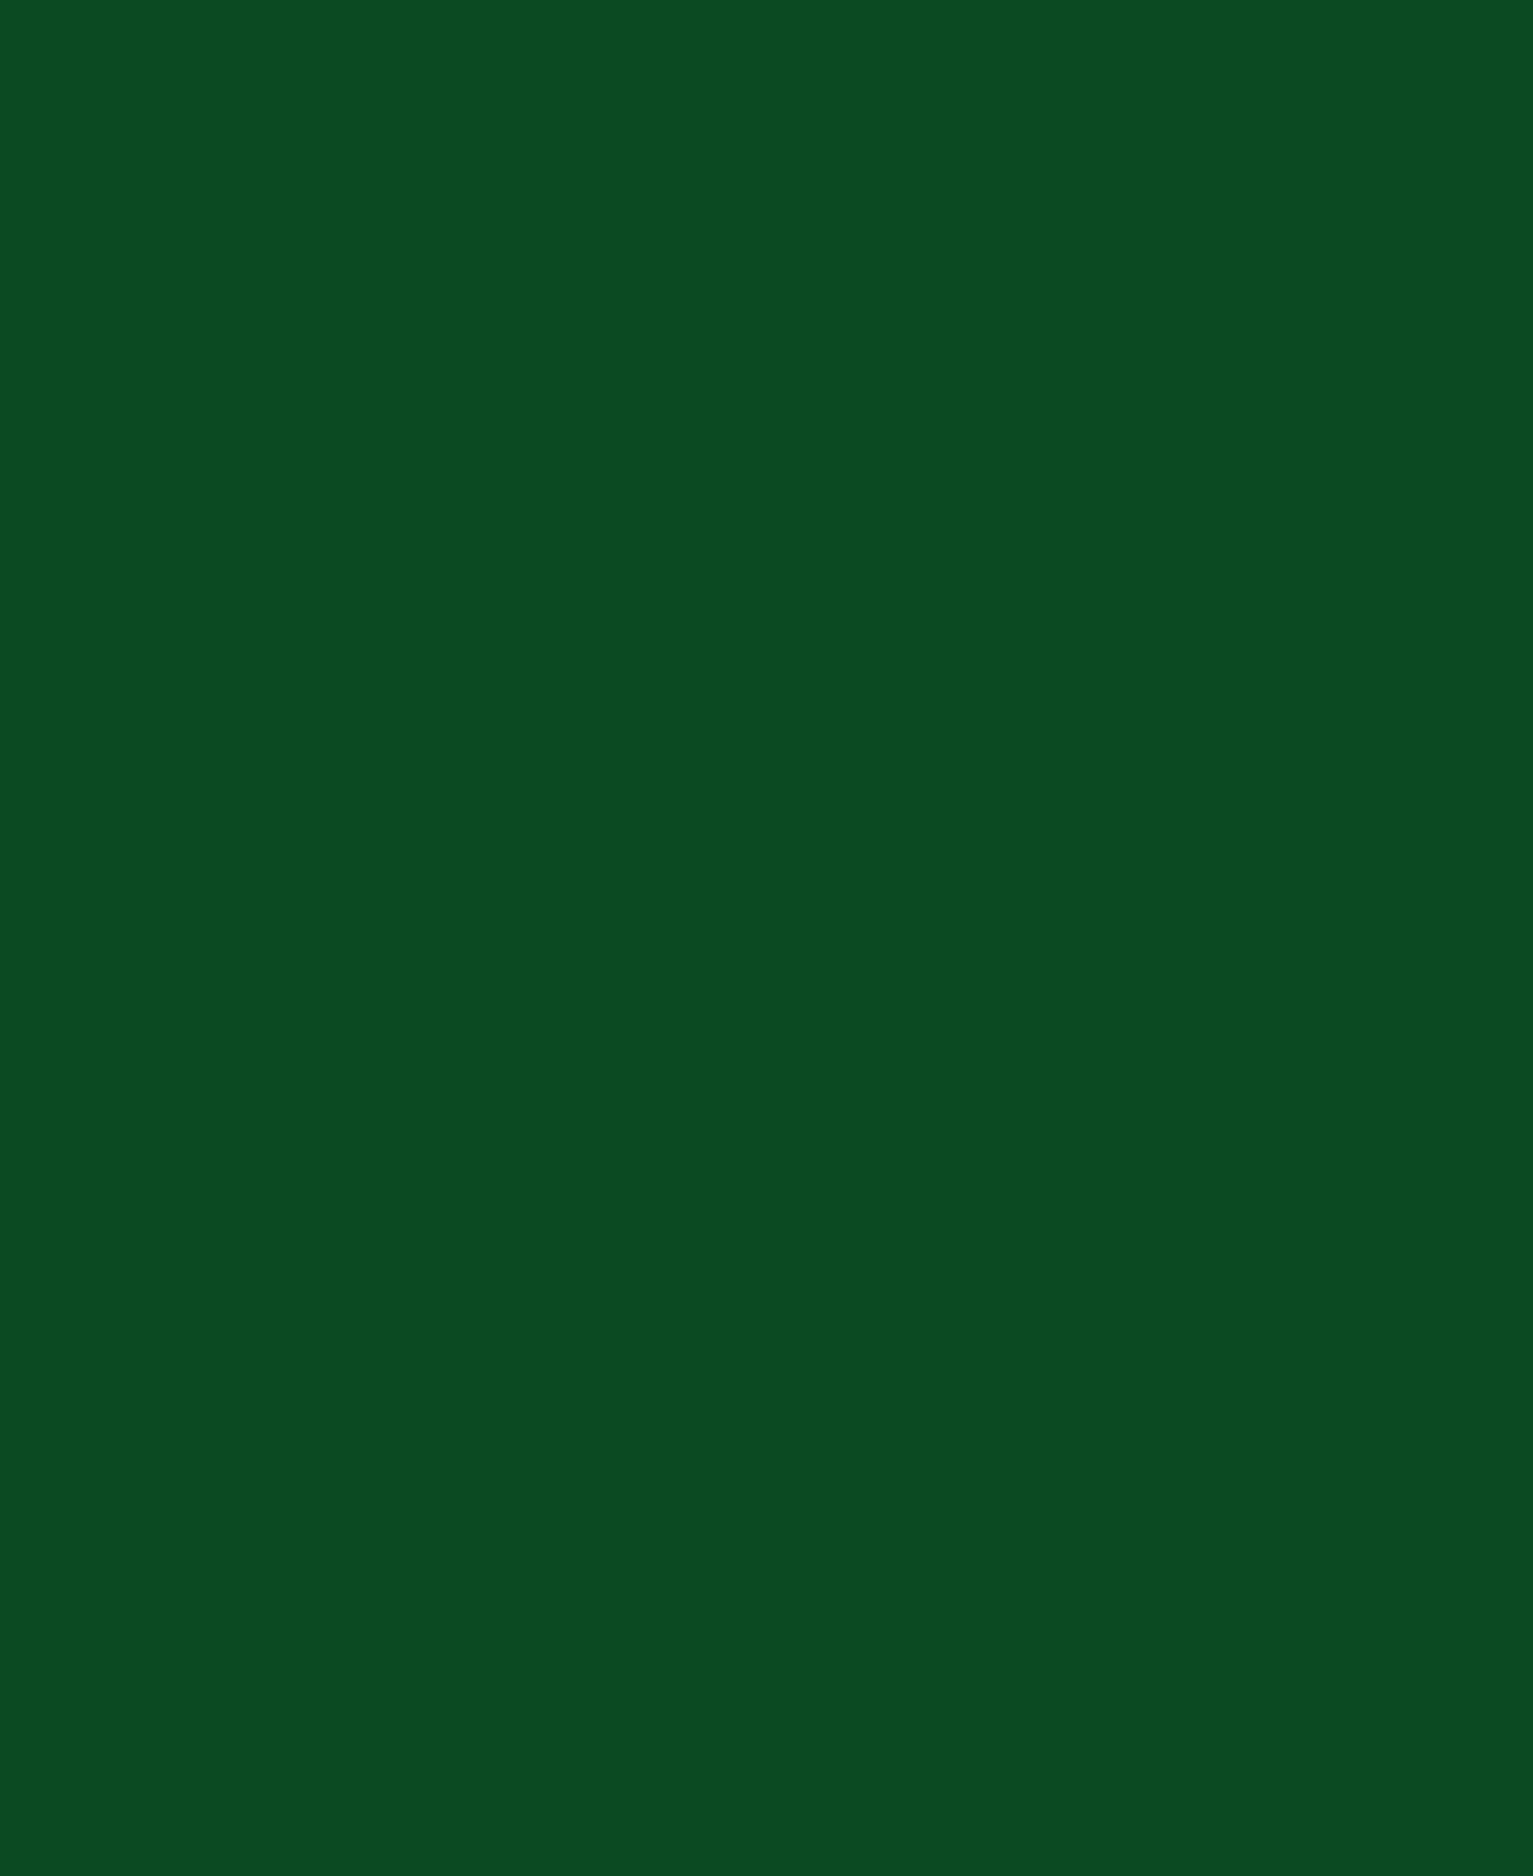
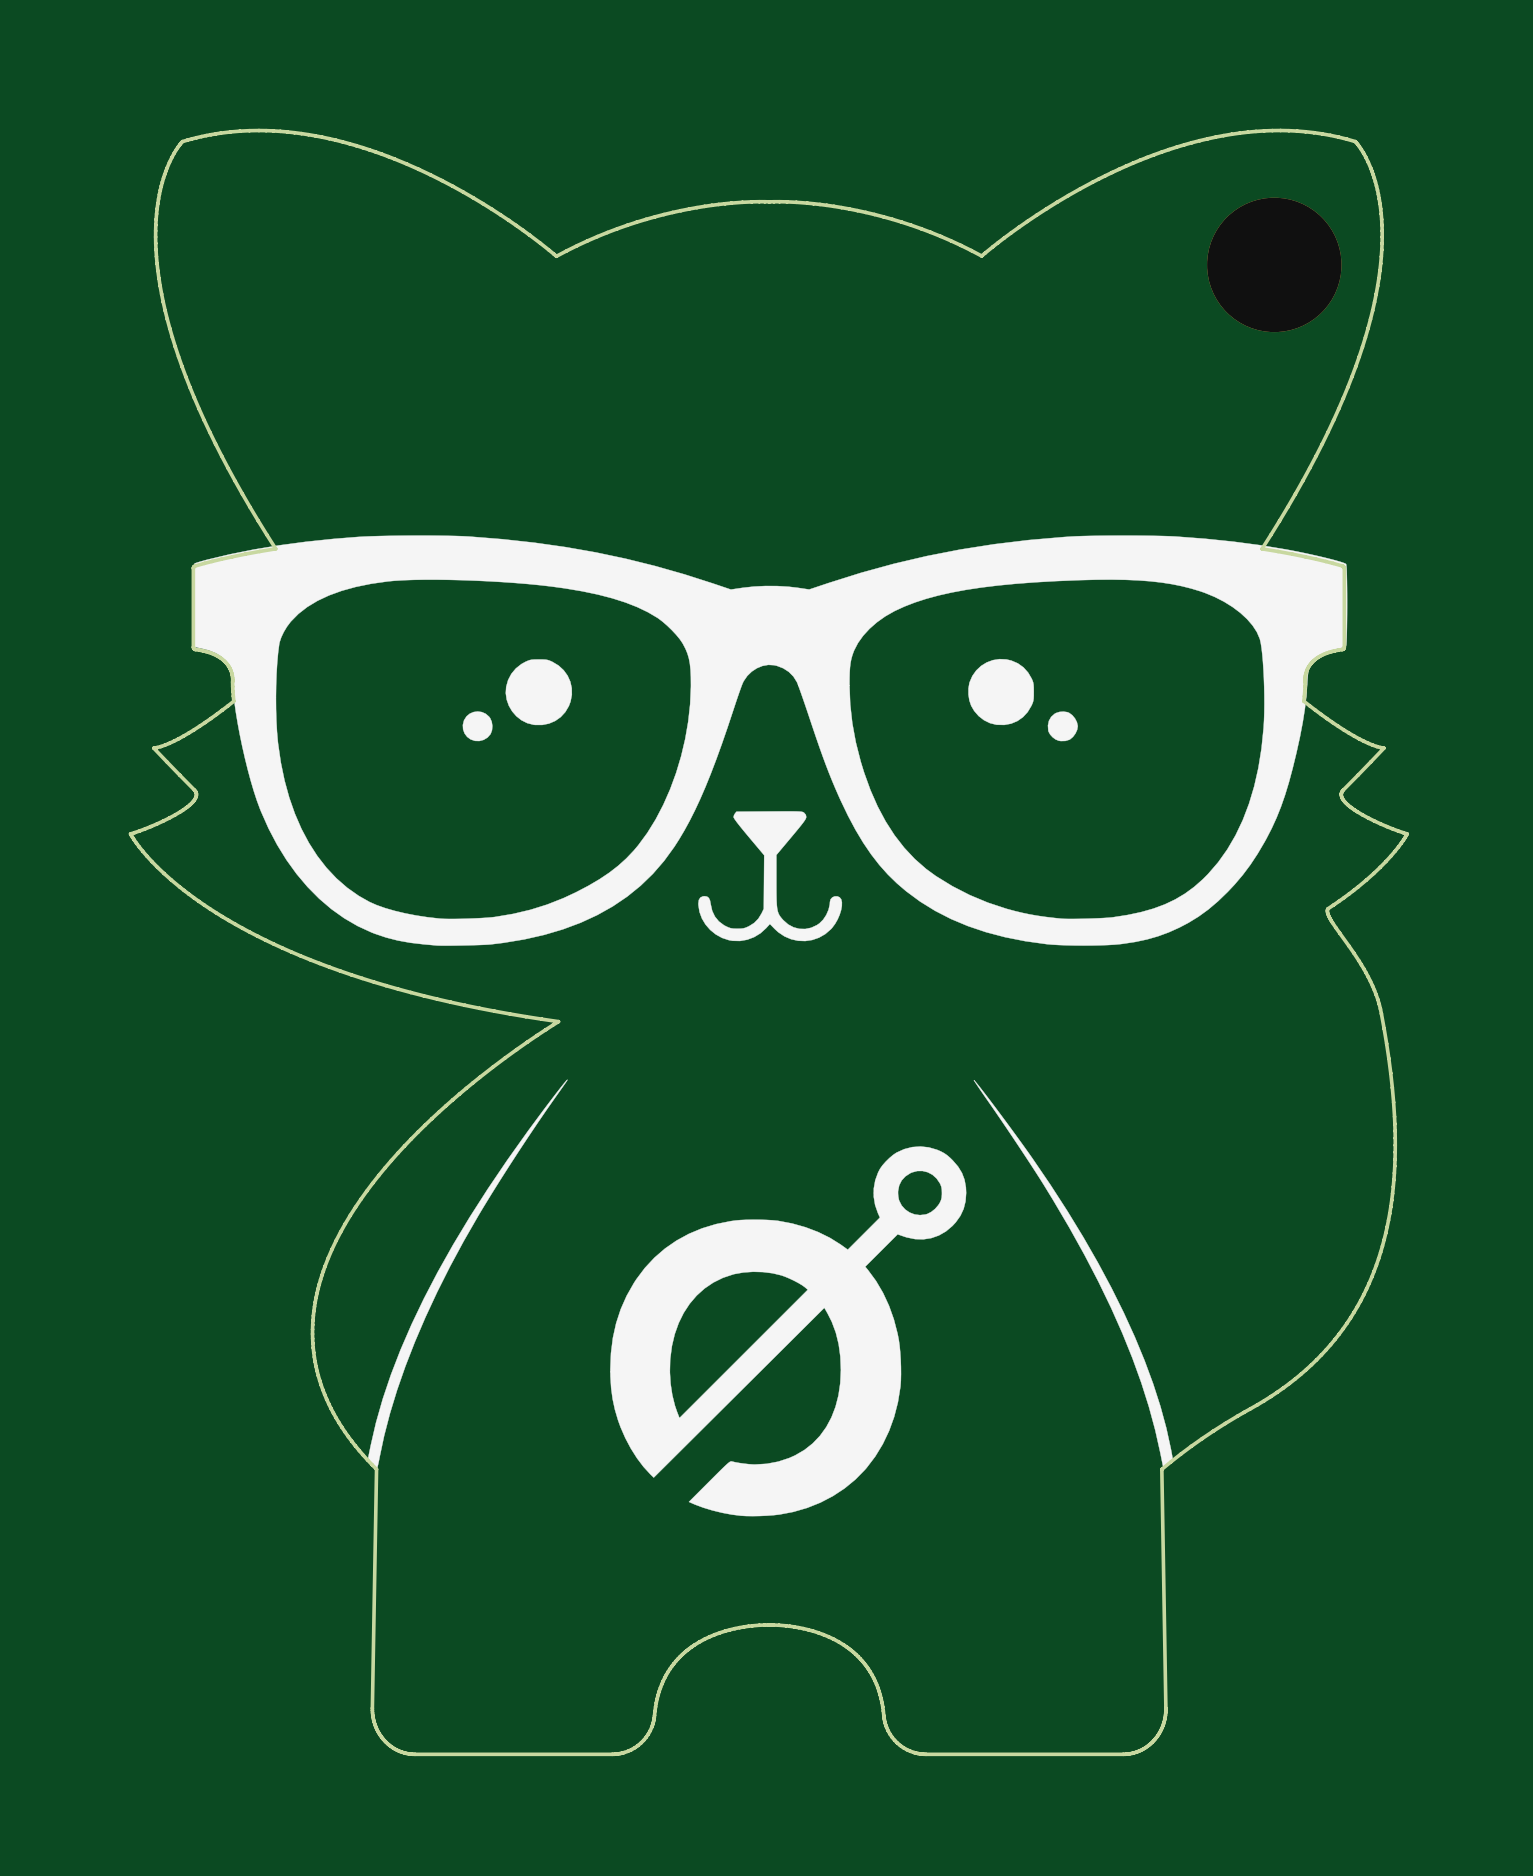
part: none -> (1274, 264)
drawing: none -> [193, 535, 1348, 1517]
board edge: none -> (196, 793) (153, 748) (169, 743) (188, 733) (233, 701) (232, 675) (227, 664) (216, 655) (193, 648) (193, 567) (221, 559) (275, 548) (235, 481) (204, 420) (182, 366) (165, 310) (156, 256) (156, 213) (165, 171) (174, 153) (182, 141) (220, 133) (266, 130) (315, 135) (362, 147) (406, 164) (463, 192) (516, 225) (556, 256) (607, 232) (655, 216) (704, 206) (759, 201) (813, 203) (874, 214) (930, 232) (981, 256) (1018, 227) (1057, 202) (1092, 182) (1132, 163) (1169, 149) (1207, 138) (1247, 132) (1280, 130) (1322, 133) (1355, 141) (1363, 153) (1371, 171) (1381, 213) (1381, 249) (1377, 286) (1368, 328) (1355, 366) (1338, 409) (1316, 455) (1262, 548) (1316, 559) (1344, 567) (1344, 648) (1321, 655) (1309, 664) (1305, 675) (1303, 701) (1348, 733) (1368, 743) (1383, 748) (1341, 793)
board edge: none -> (196, 794) (193, 801) (180, 811) (157, 823) (130, 833) (142, 851) (164, 873) (215, 912) (282, 947) (362, 978) (450, 1002) (558, 1021) (516, 1049) (466, 1088) (424, 1125) (391, 1160) (361, 1199) (340, 1232) (324, 1266) (316, 1297) (312, 1320) (312, 1343) (321, 1385) (341, 1427) (376, 1469) (373, 1719) (379, 1733) (389, 1745) (402, 1752) (414, 1754) (612, 1754) (627, 1751) (638, 1745) (648, 1734) (653, 1723) (661, 1684) (669, 1669) (682, 1654) (699, 1642) (720, 1632) (739, 1627) (764, 1625) (789, 1626) (813, 1631) (833, 1639) (853, 1652) (866, 1666) (875, 1681) (881, 1698) (885, 1723) (890, 1734) (900, 1745) (914, 1752) (925, 1754) (1125, 1754) (1140, 1750) (1153, 1740) (1162, 1726) (1165, 1710) (1161, 1469) (1213, 1431) (1283, 1387) (1306, 1369) (1326, 1349) (1346, 1323) (1366, 1289) (1378, 1258) (1388, 1220) (1394, 1173) (1394, 1123) (1390, 1073) (1381, 1013) (1368, 977) (1331, 920) (1327, 910) (1373, 873) (1394, 851) (1407, 833) (1380, 823) (1357, 811) (1344, 801) (1341, 794)

